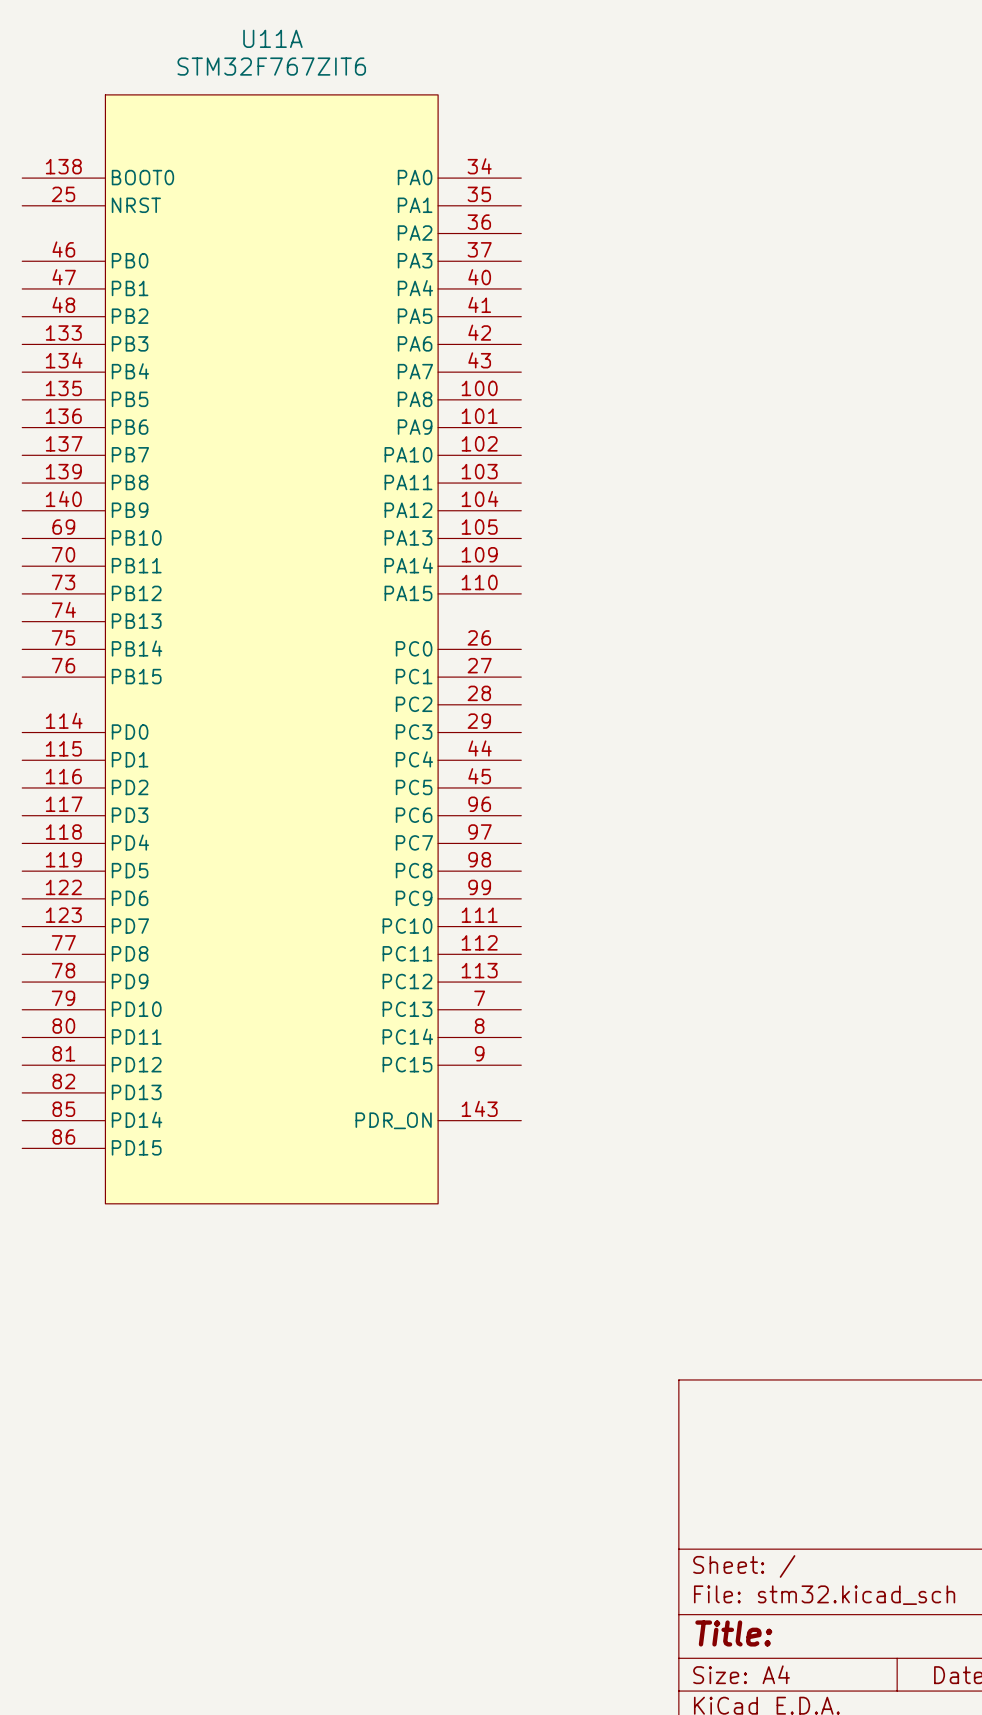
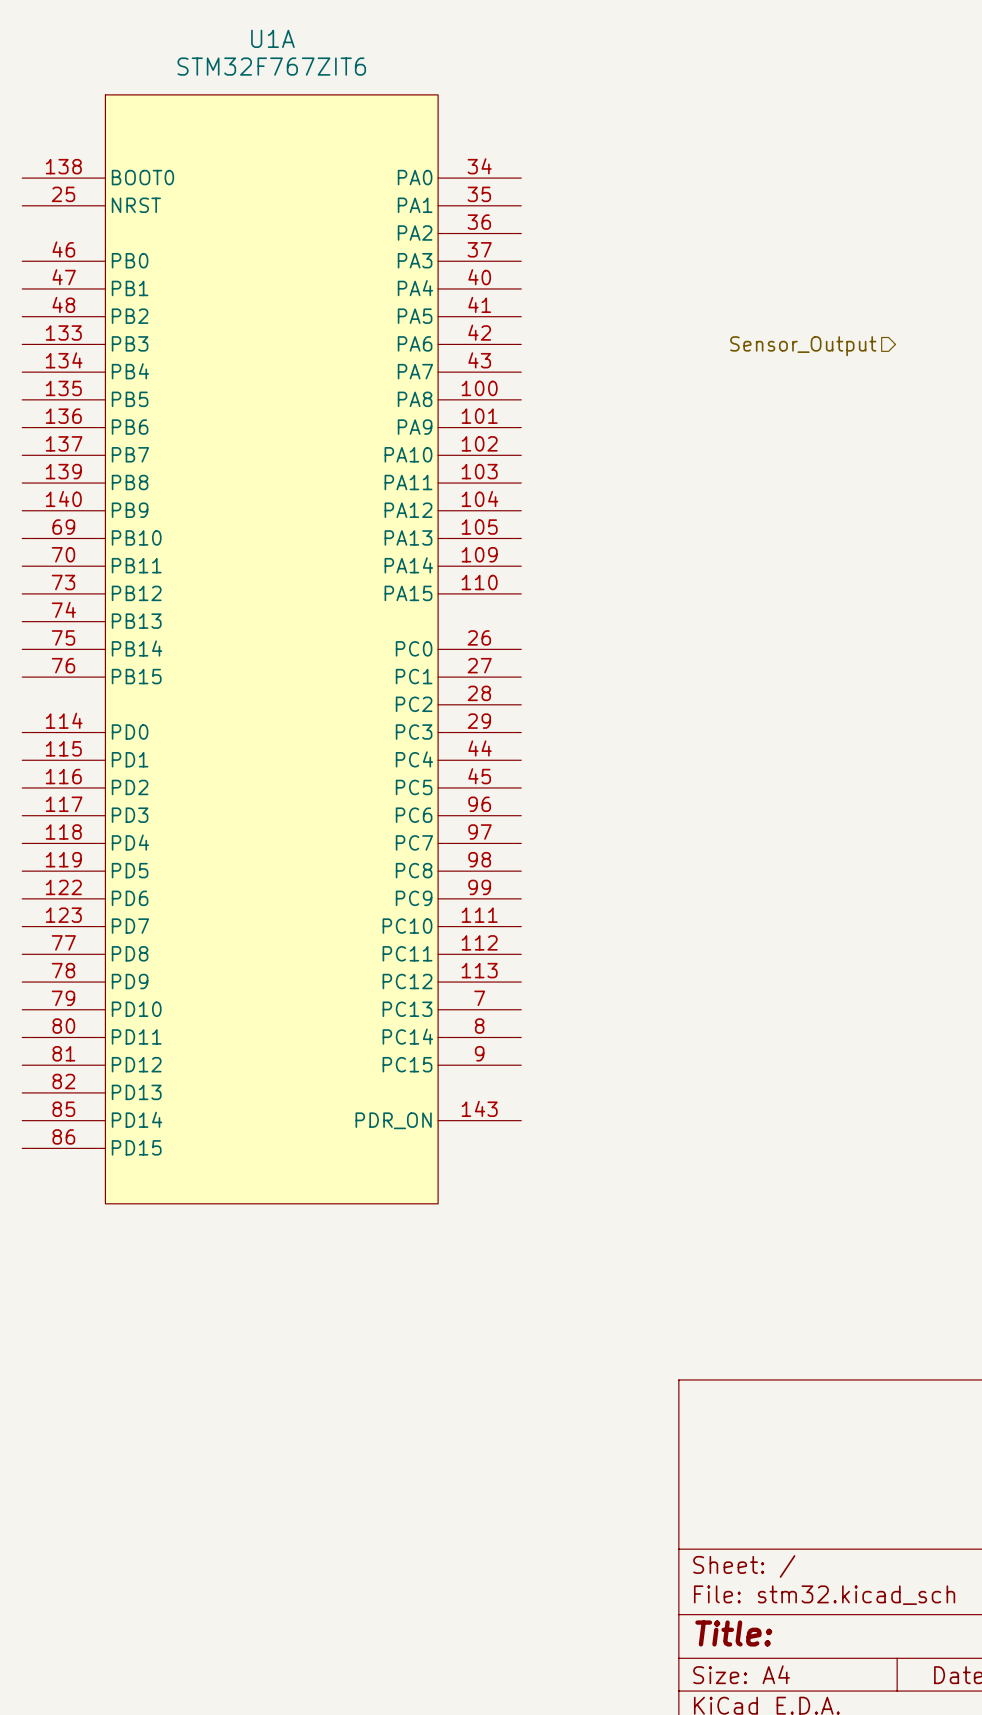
U11A name: U11A (272, 38) -> U1A (272, 38)
hierarchical label: none -> Sensor_Output (803, 346)

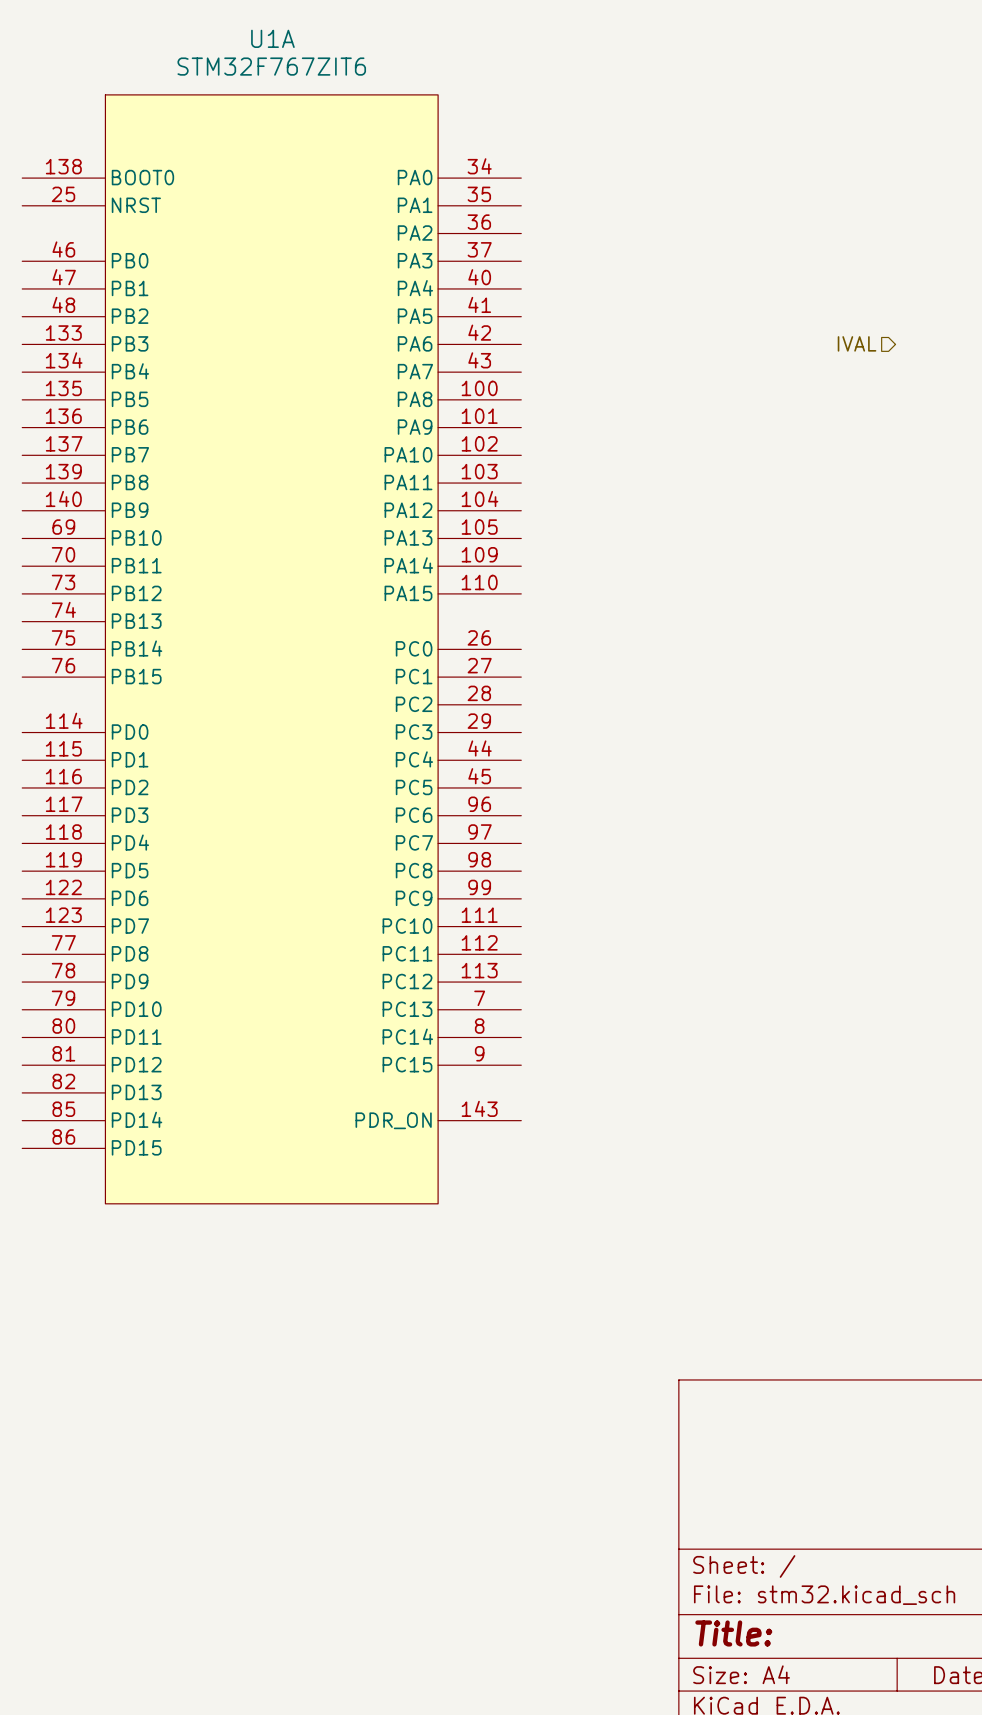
hierarchical label: Sensor_Output (803, 346) -> IVAL (857, 343)

